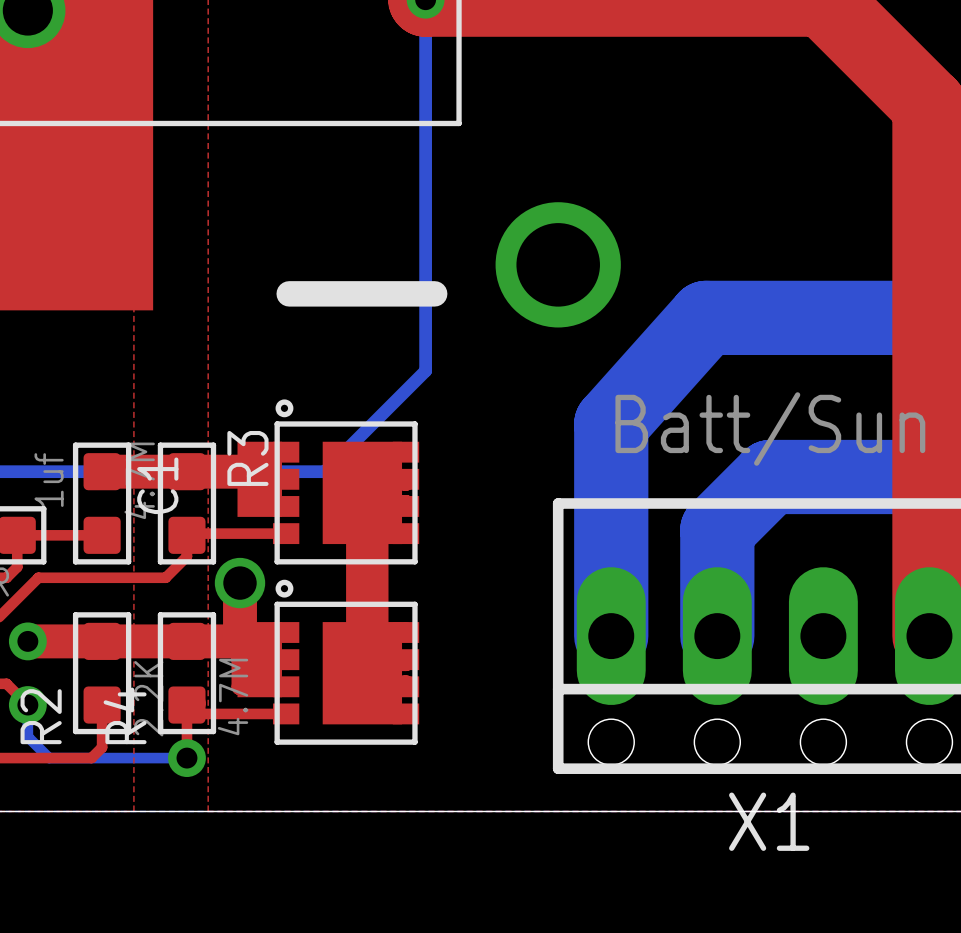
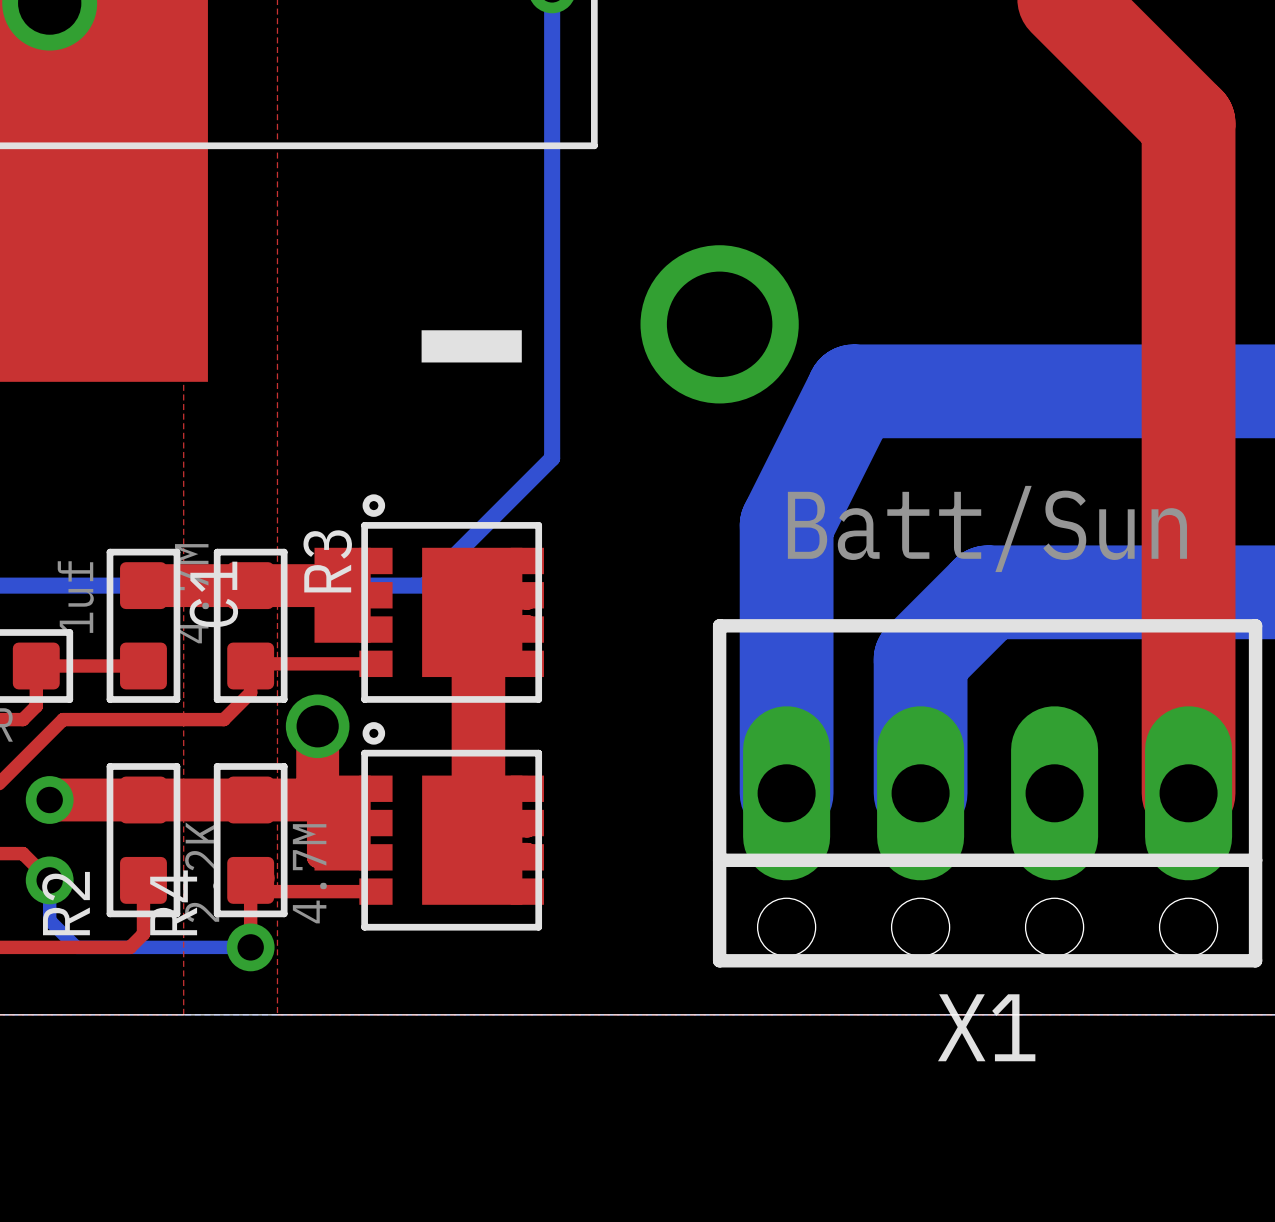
bottom track: (706, 317) (611, 423) -> (906, 391) (853, 391) (786, 525)

